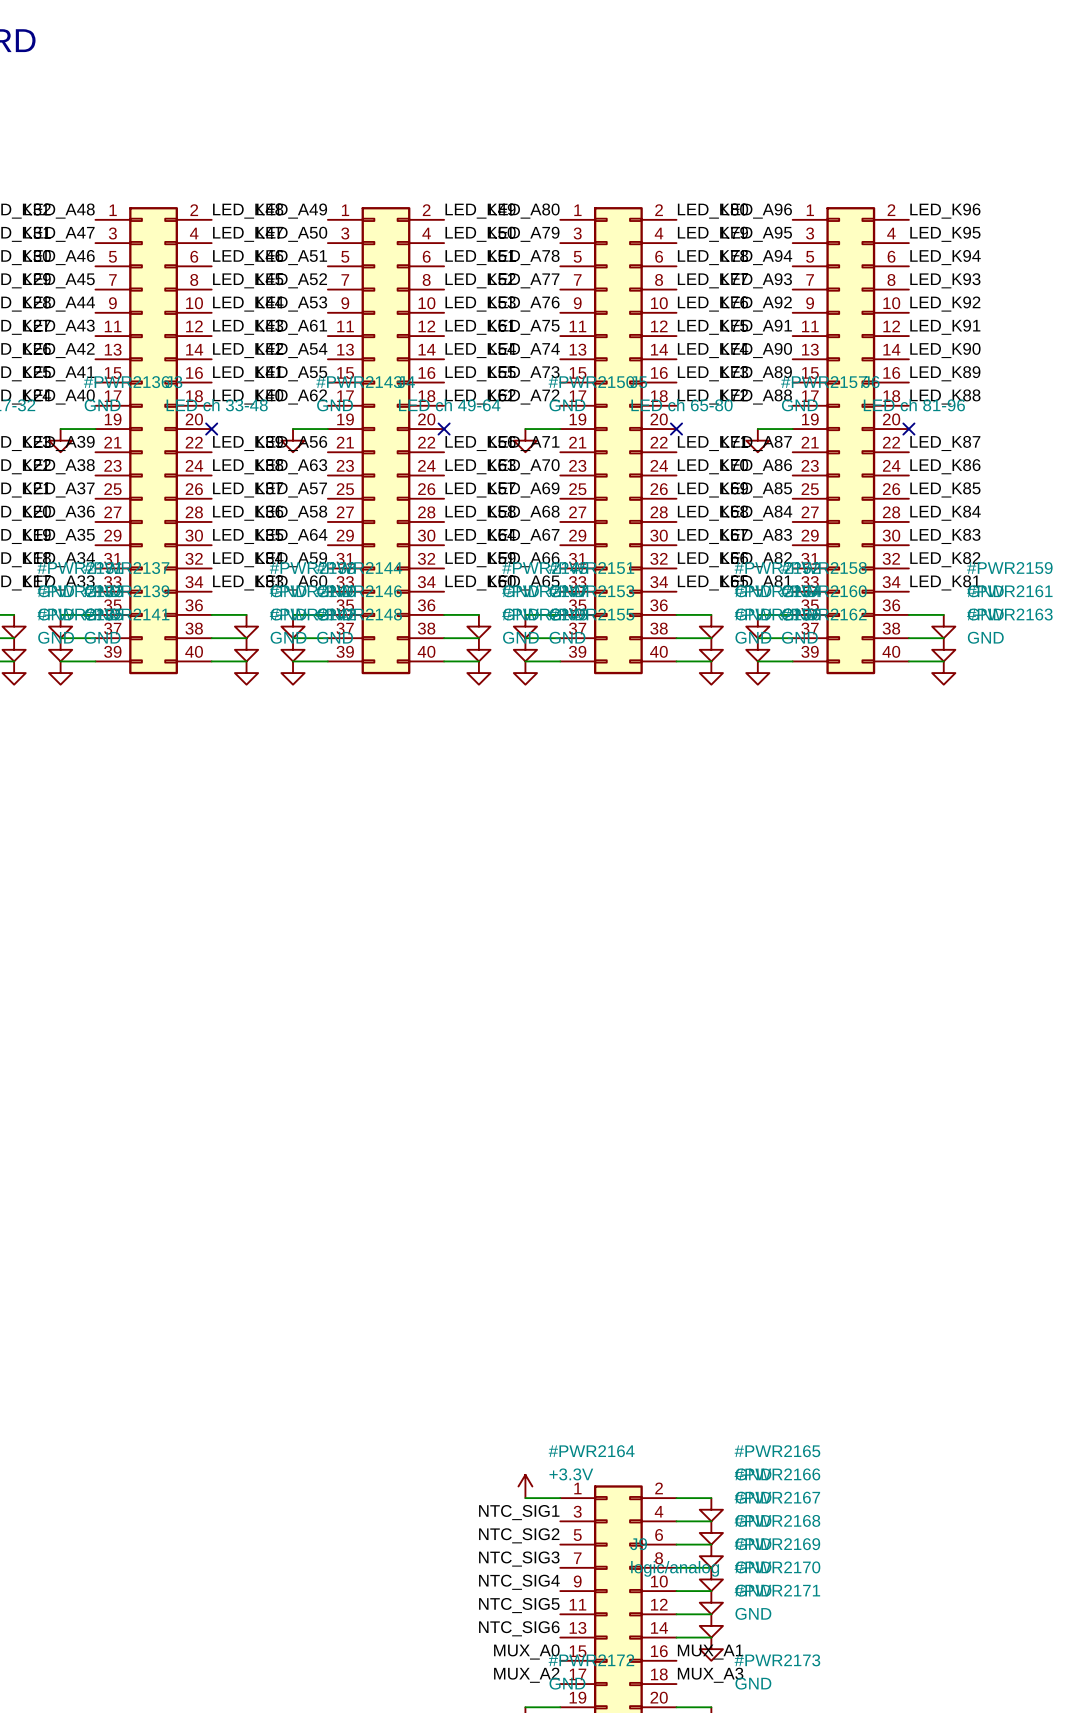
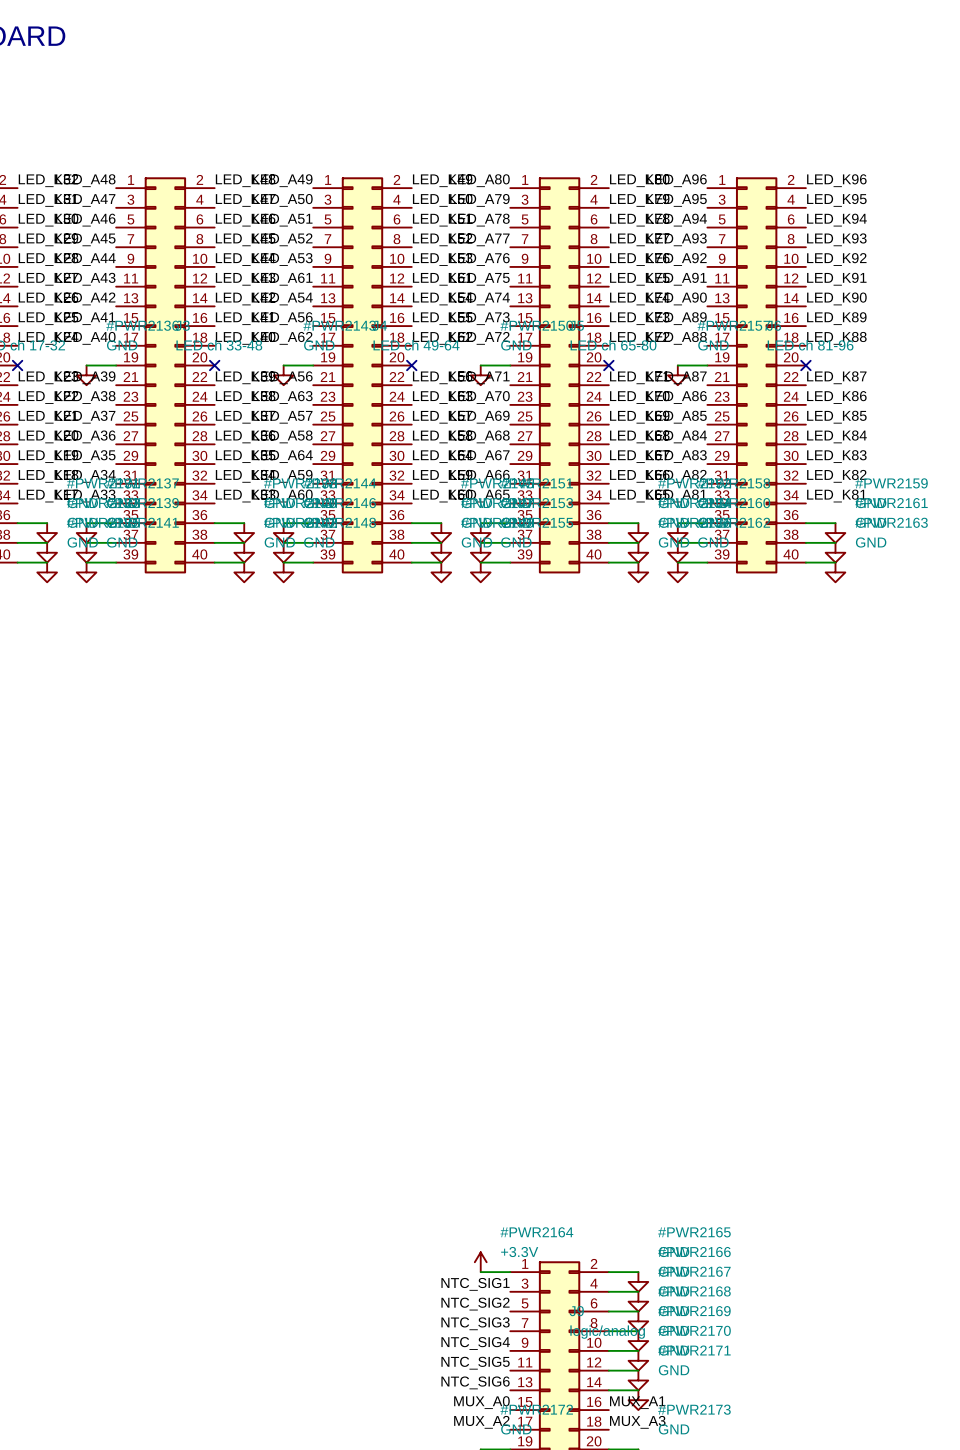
label: LED_A55 (292, 373) -> LED_A56 (282, 318)

